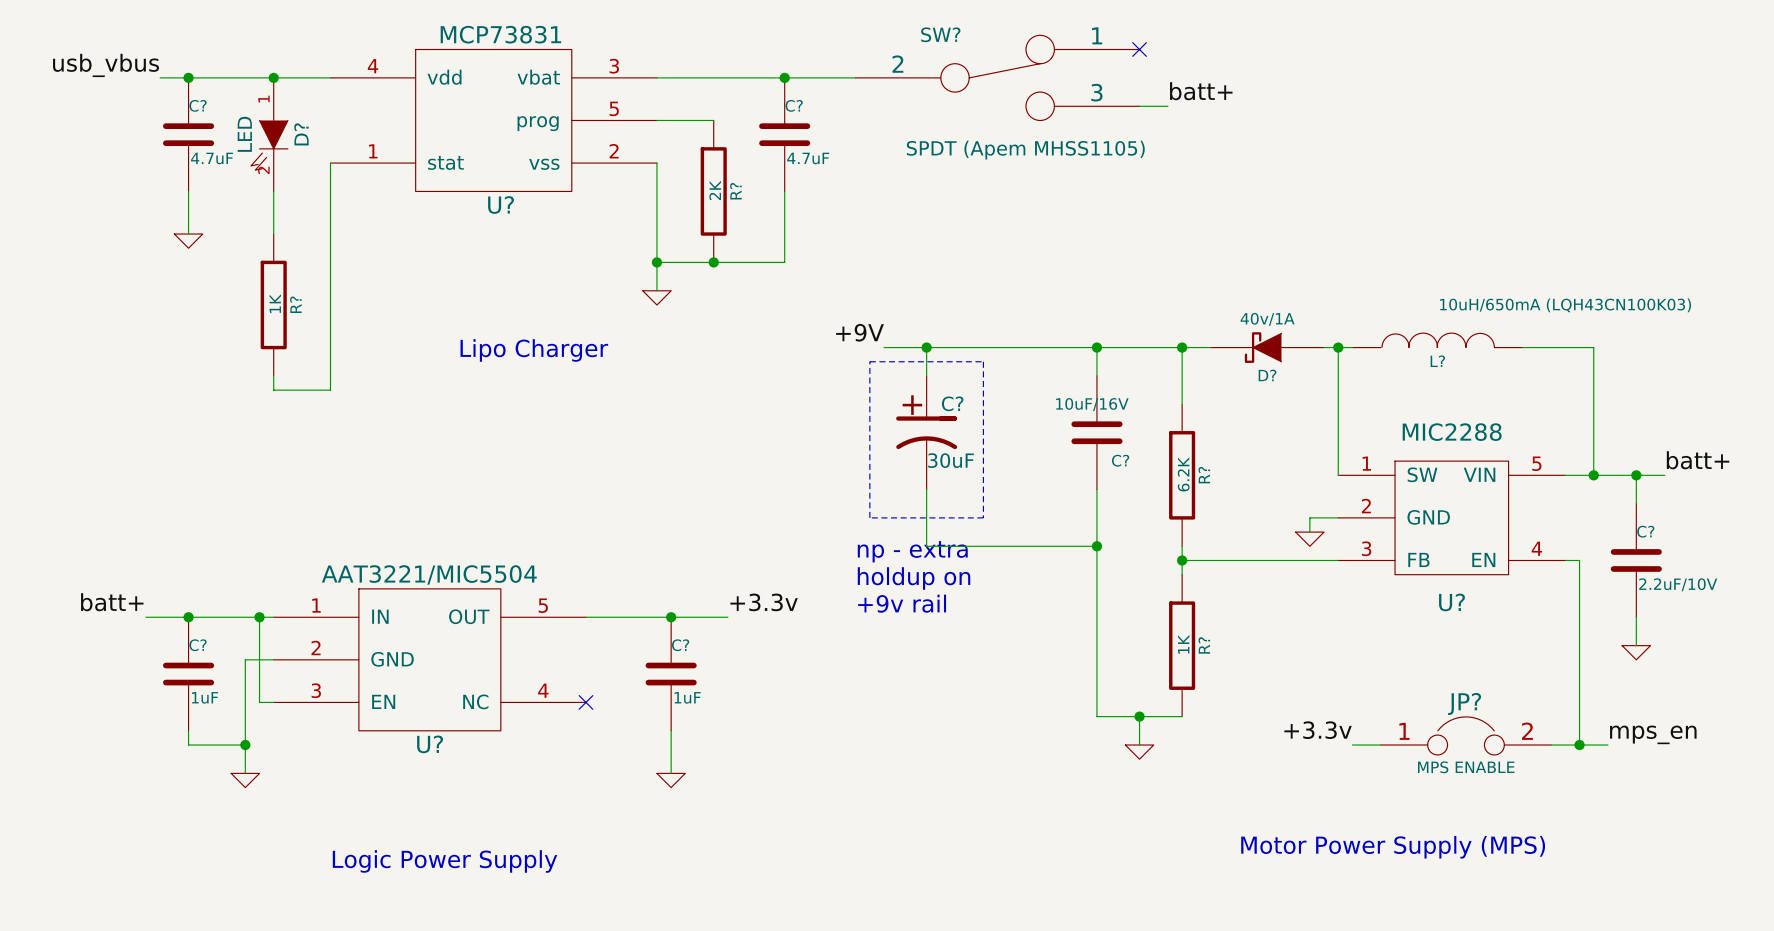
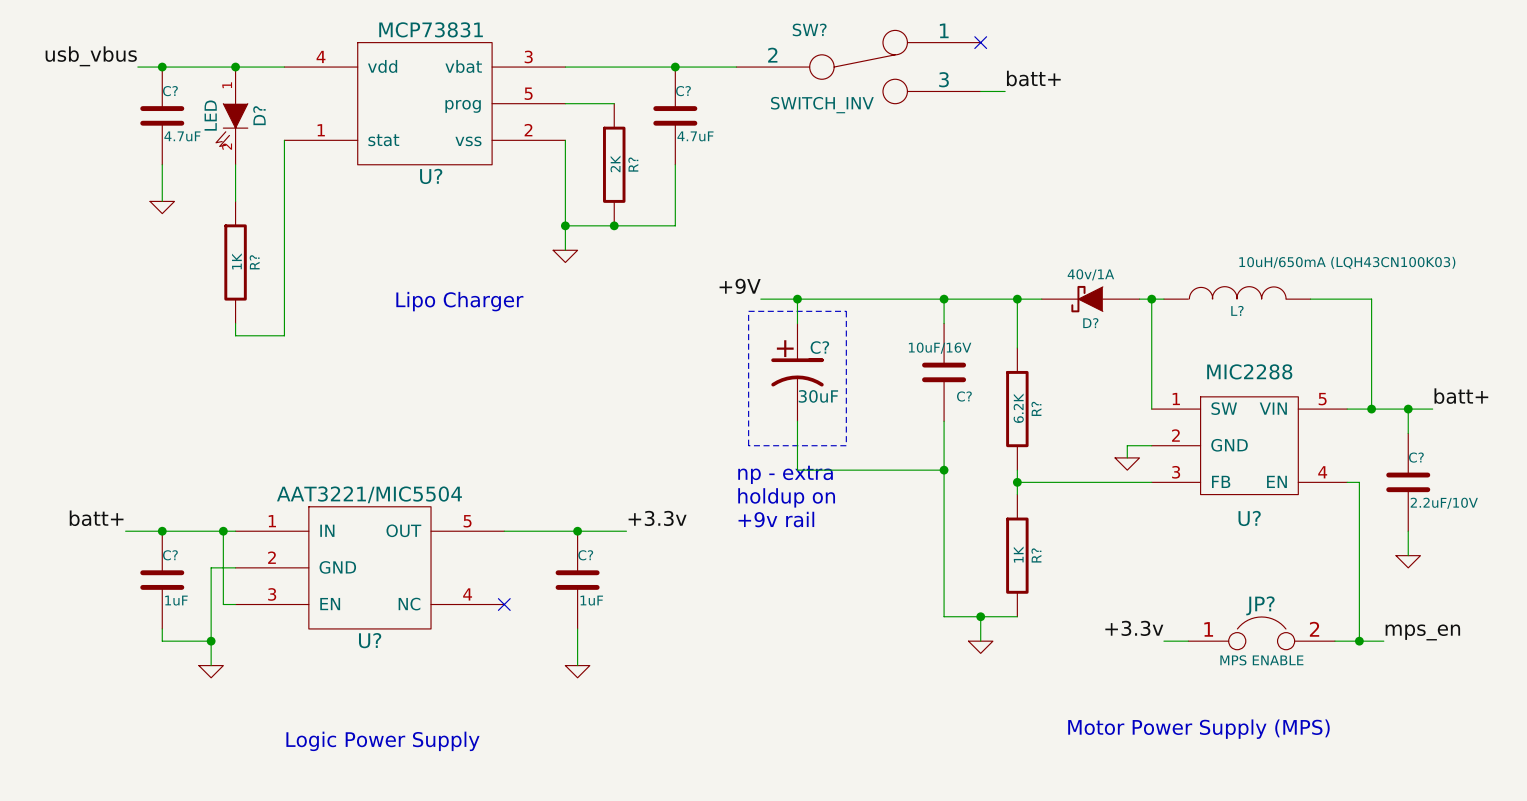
SW? value: SPDT (Apem MHSS1105) (1025, 150) -> SWITCH_INV (822, 105)

